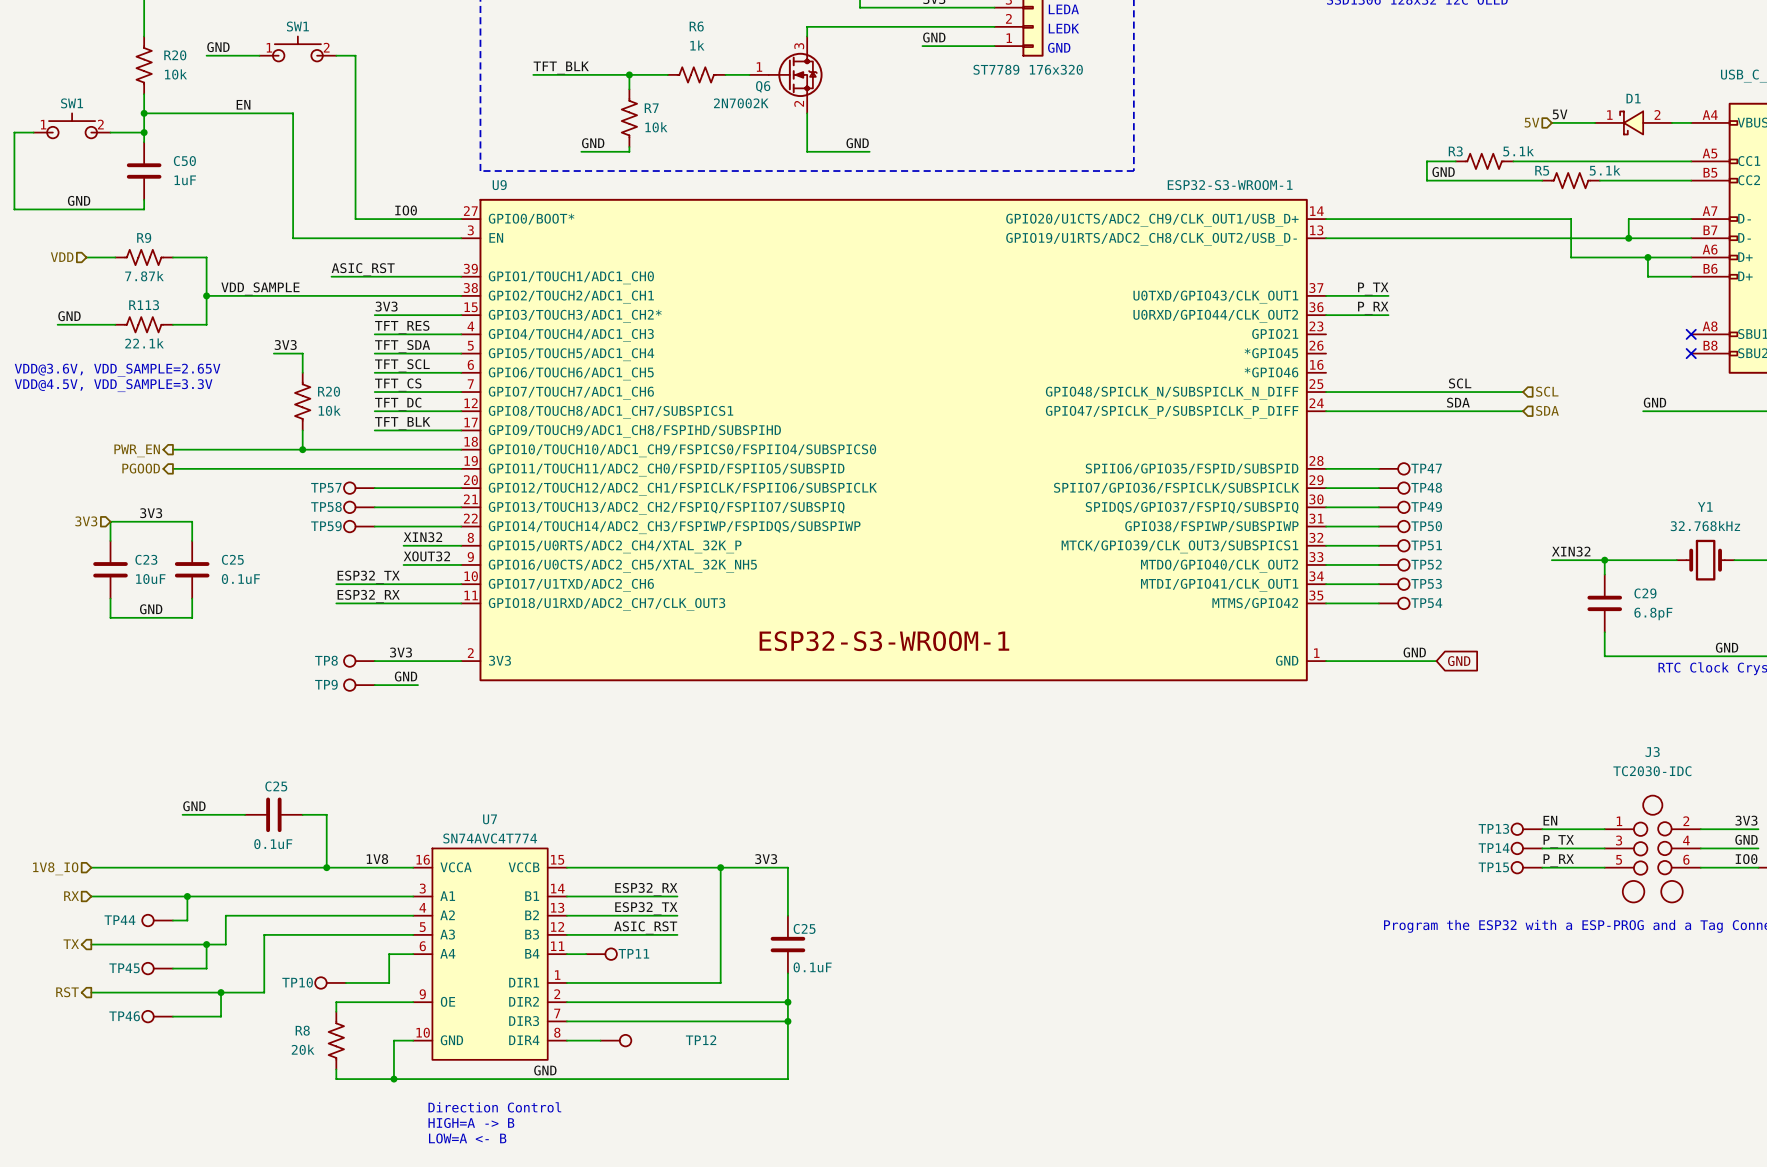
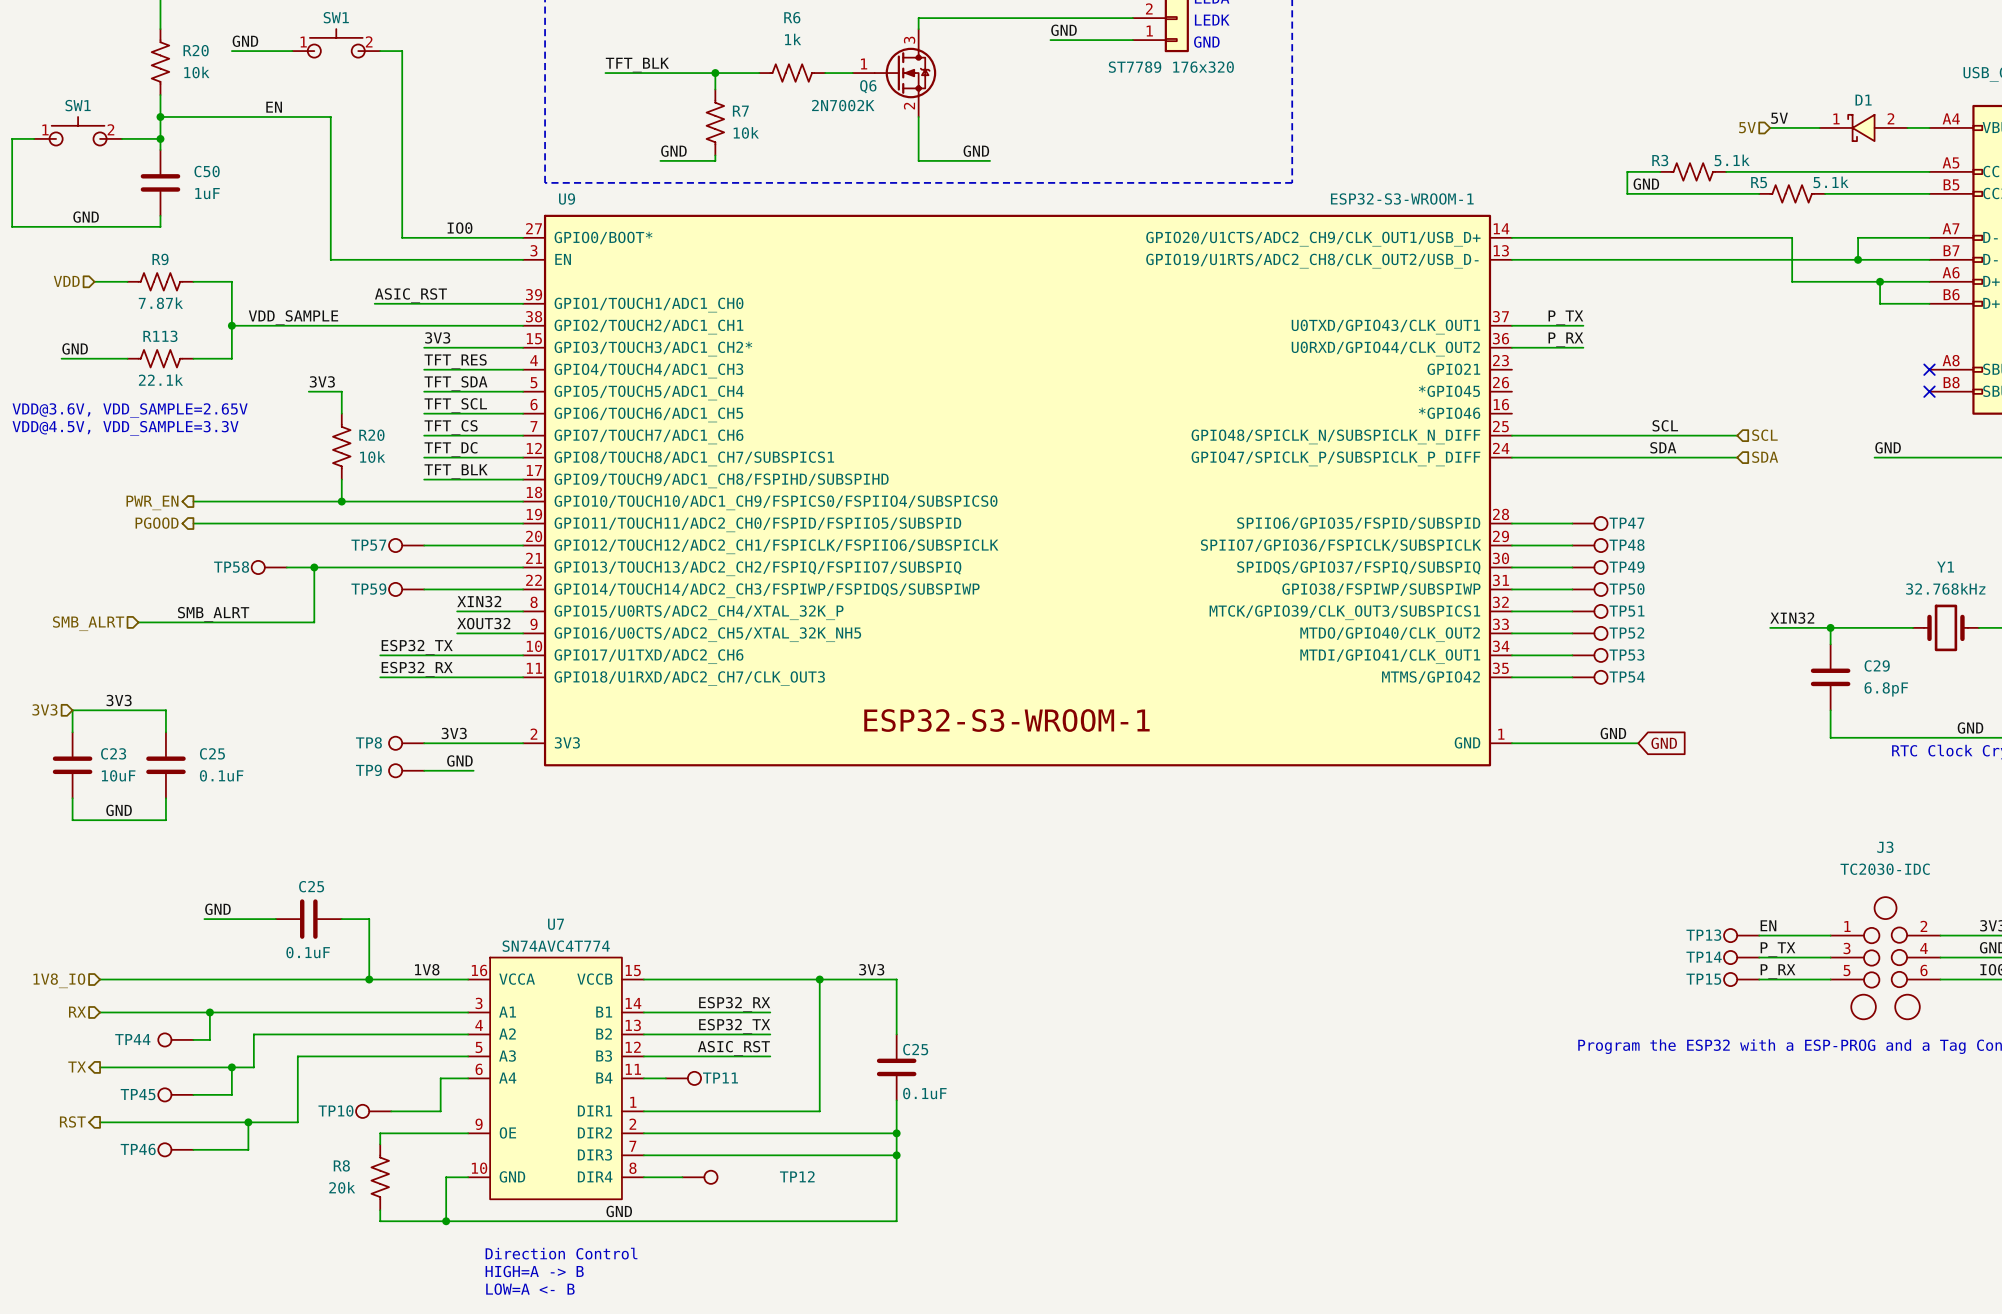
wire: none -> (286, 567) (424, 567)
wire: none -> (314, 567) (314, 622) (138, 622)
junction: none -> (314, 567)
TP58 position: (359, 507) -> (269, 567)
label position: 3V3 (151, 513) -> 3V3 (119, 700)
hierarchical label position: 3V3 (86, 521) -> 3V3 (44, 709)
wire: (110, 540) (110, 521) (192, 521) (192, 540) -> (72, 732) (72, 710) (165, 710) (165, 732)
label: none -> SMB_ALRT (213, 614)
hierarchical label: none -> SMB_ALRT (88, 623)
C23 position: (110, 569) -> (72, 765)
C25 position: (192, 569) -> (165, 765)
wire: (110, 598) (110, 617) (192, 617) (192, 598) -> (72, 798) (72, 820) (165, 820) (165, 798)
label position: GND (151, 609) -> GND (119, 810)

